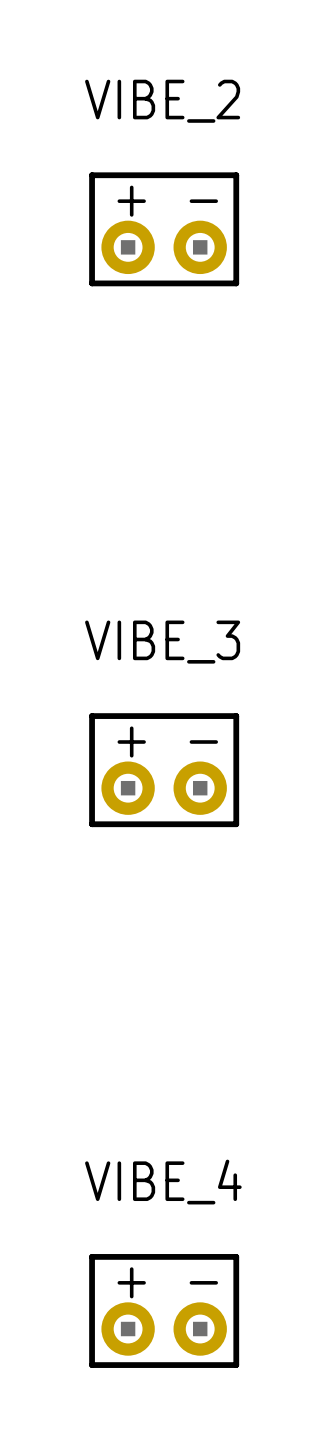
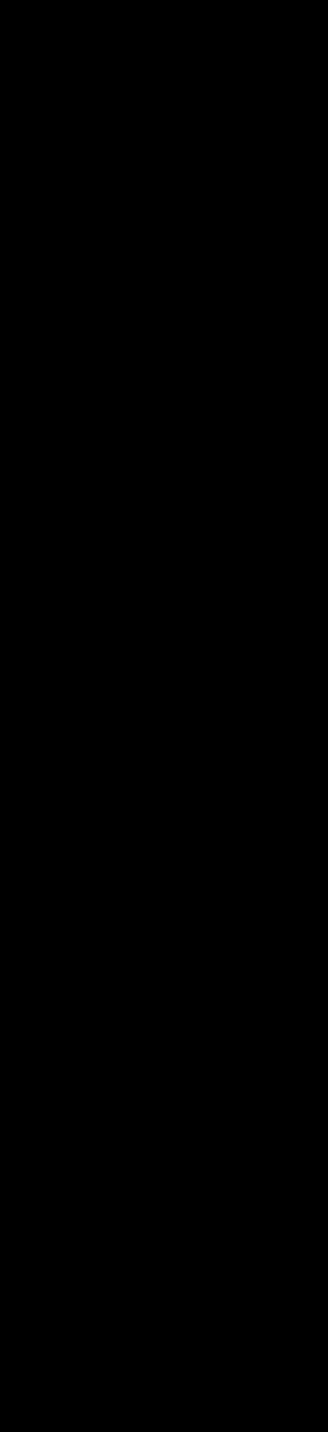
VIBE_2: (164, 229) -> none
VIBE_3: (164, 770) -> none
VIBE_4: (164, 1310) -> none

